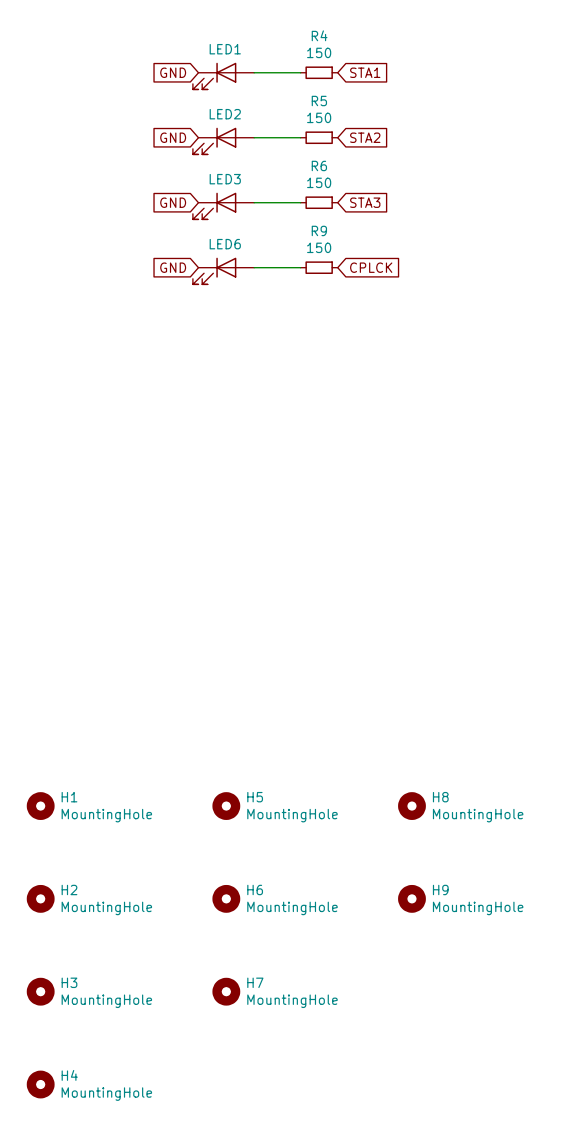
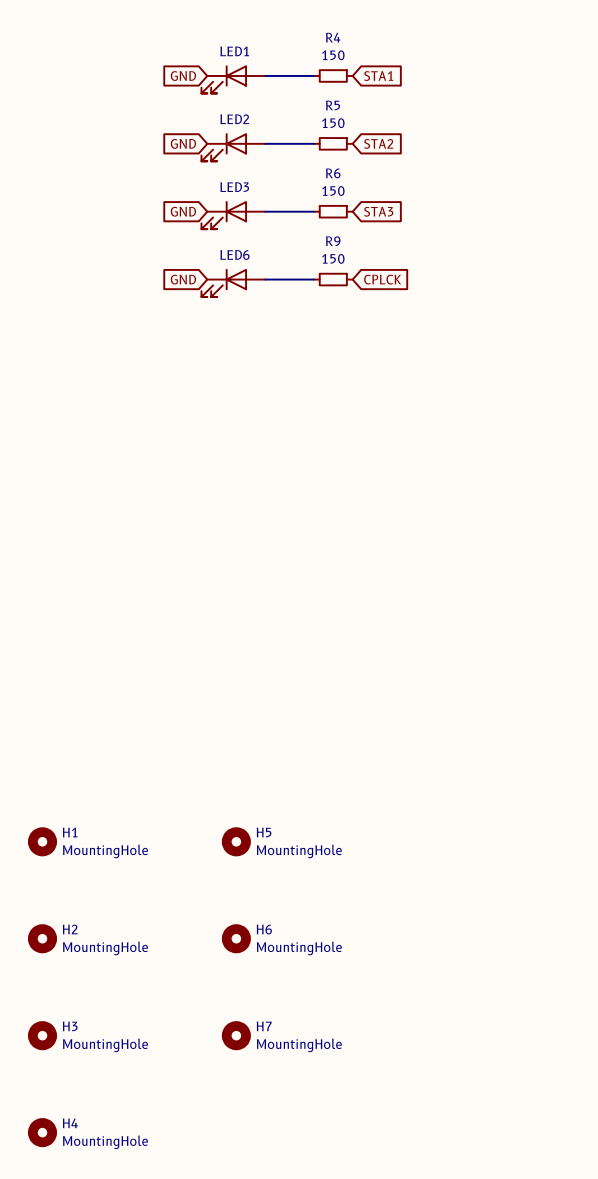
H8: MountingHole (411, 806) -> none
H9: MountingHole (411, 898) -> none

